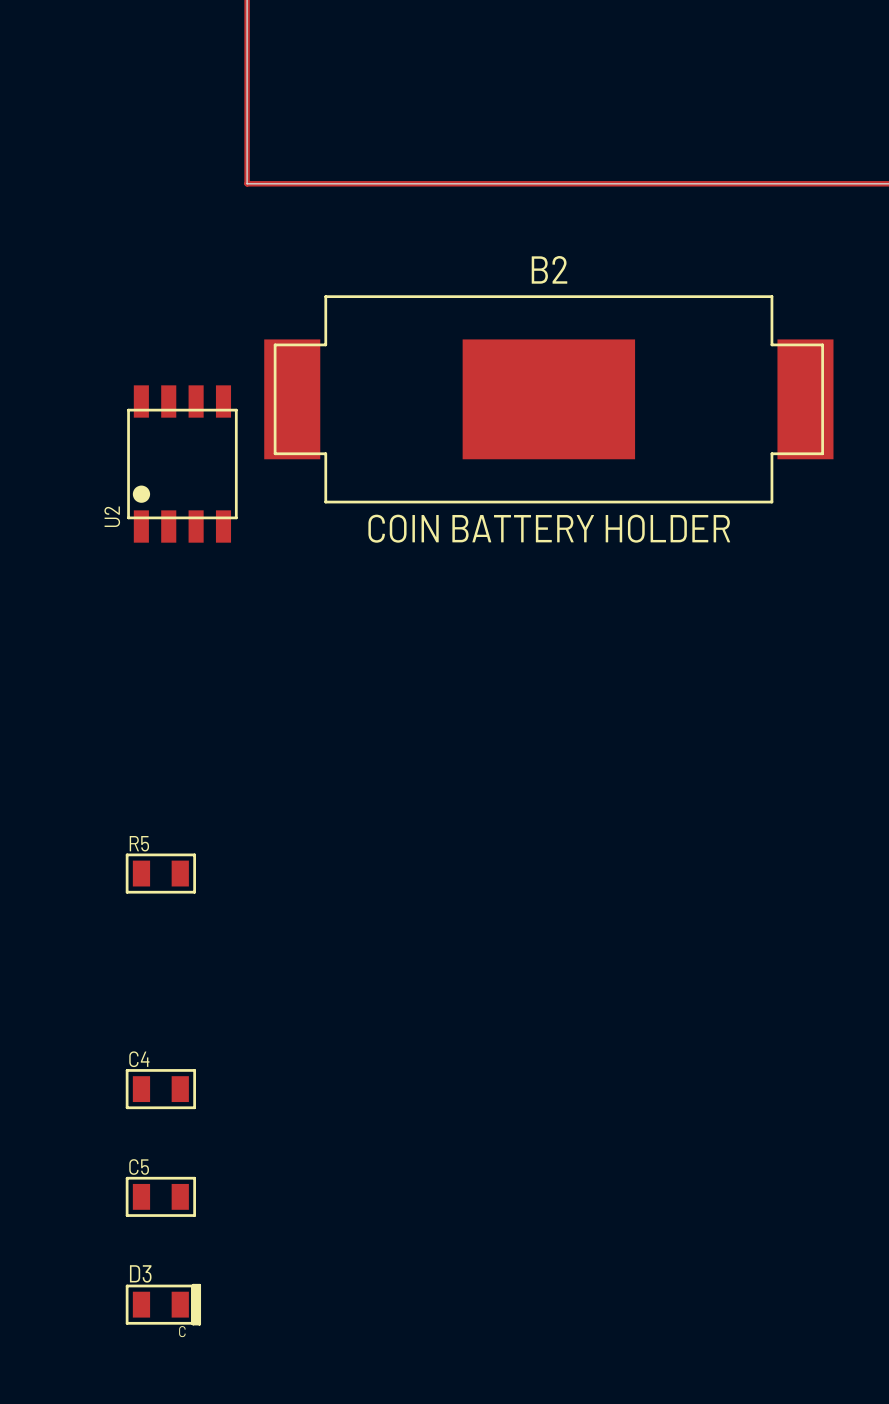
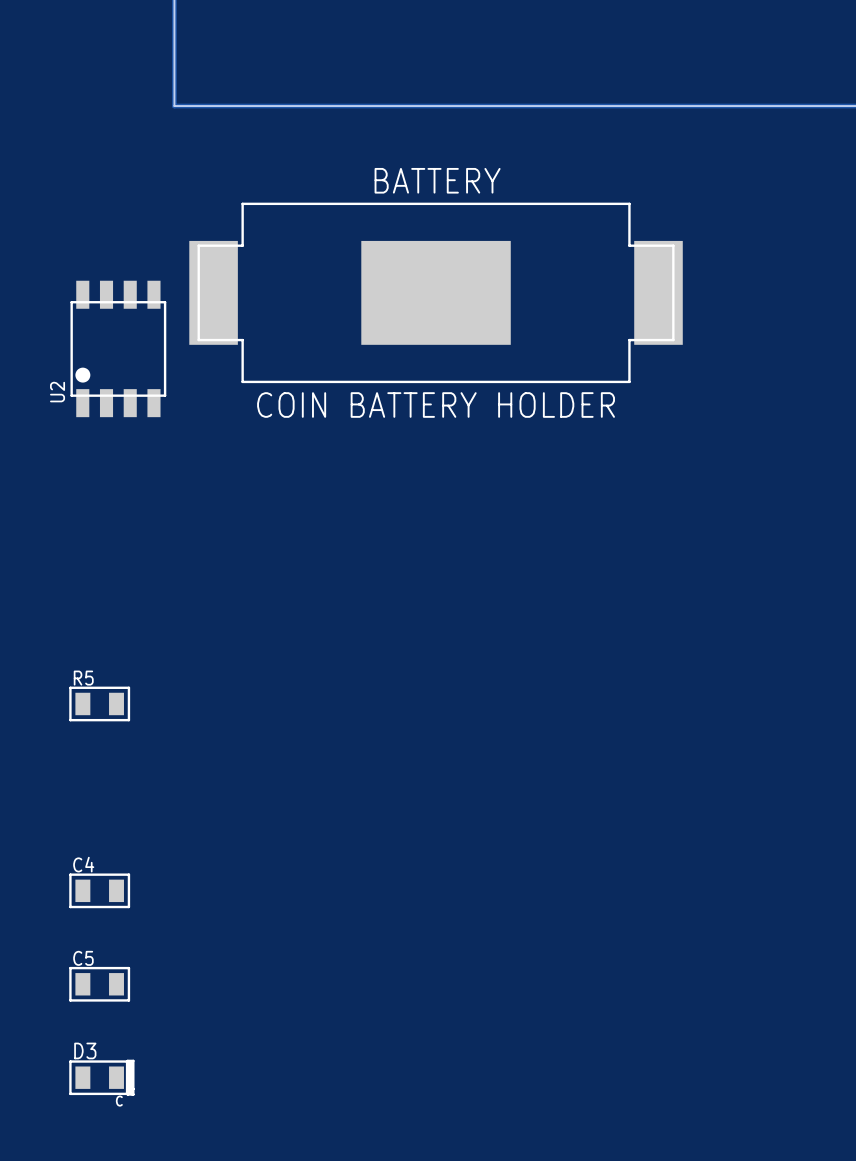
B2 name: B2 (549, 269) -> BATTERY (437, 180)

